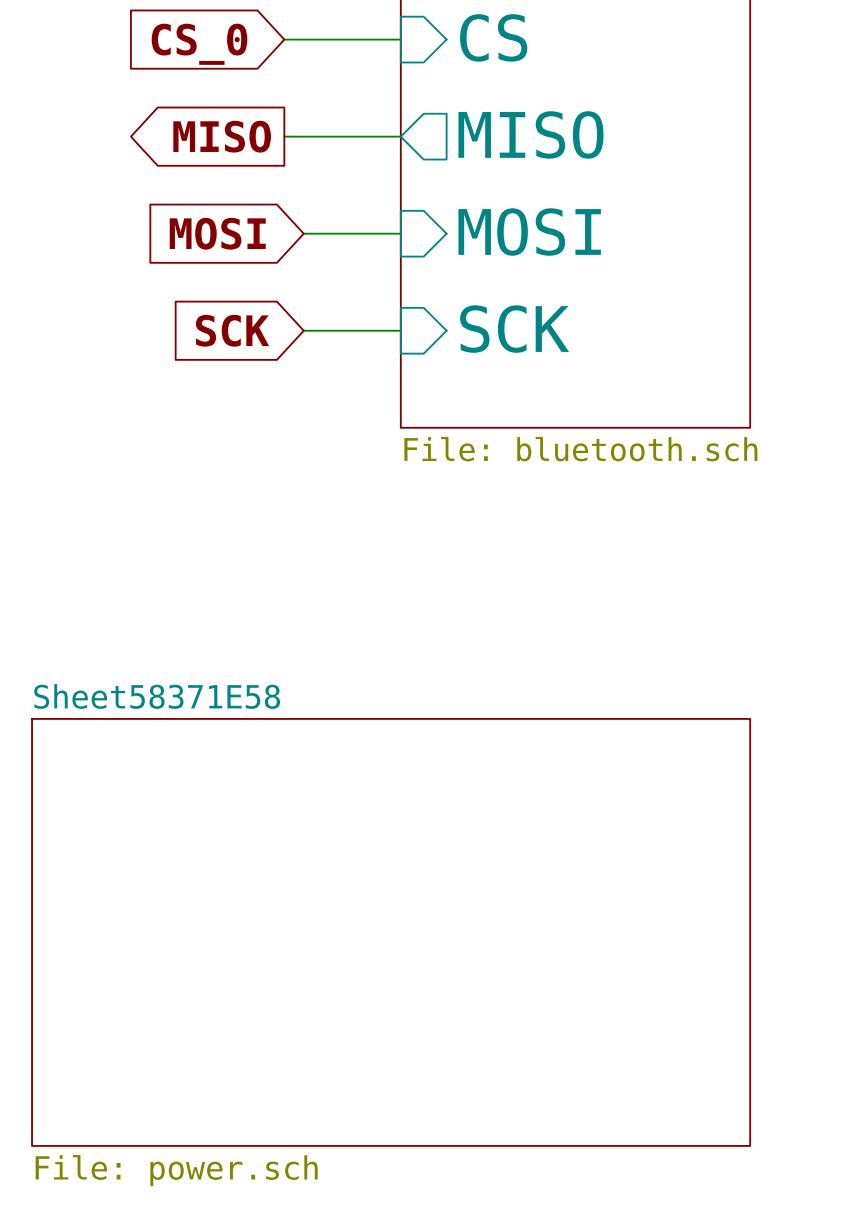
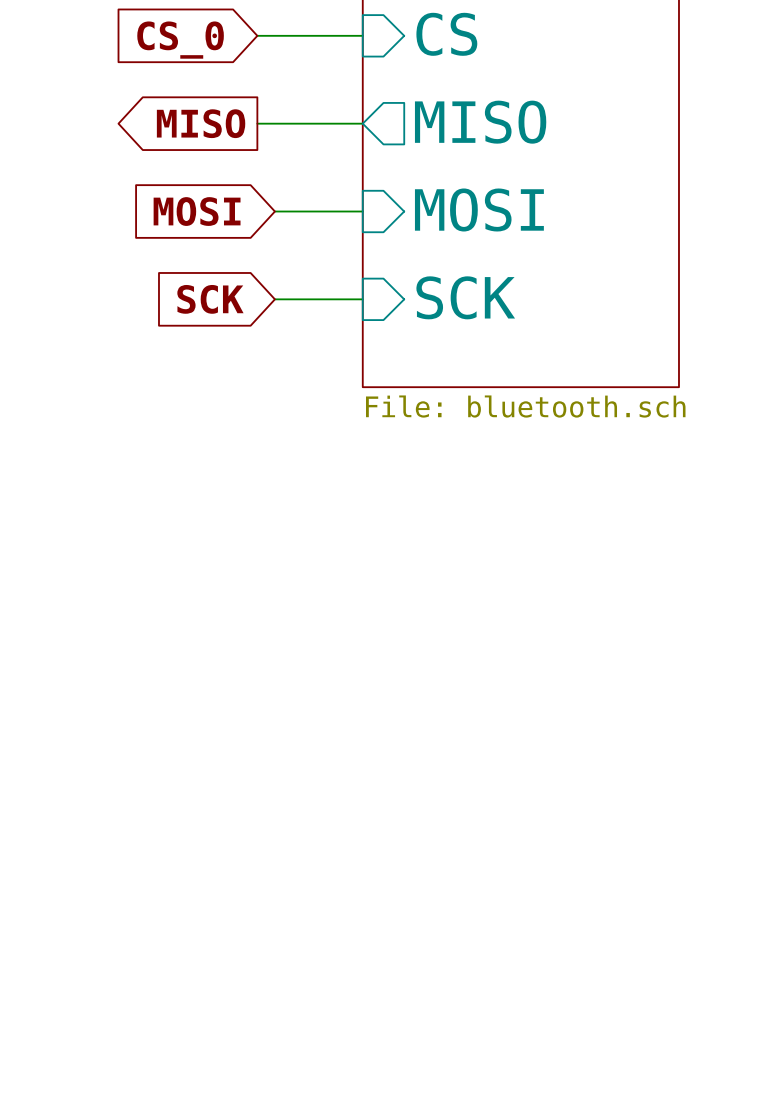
sheet Sheet58371E58: File: power.sch (391, 932) -> none

